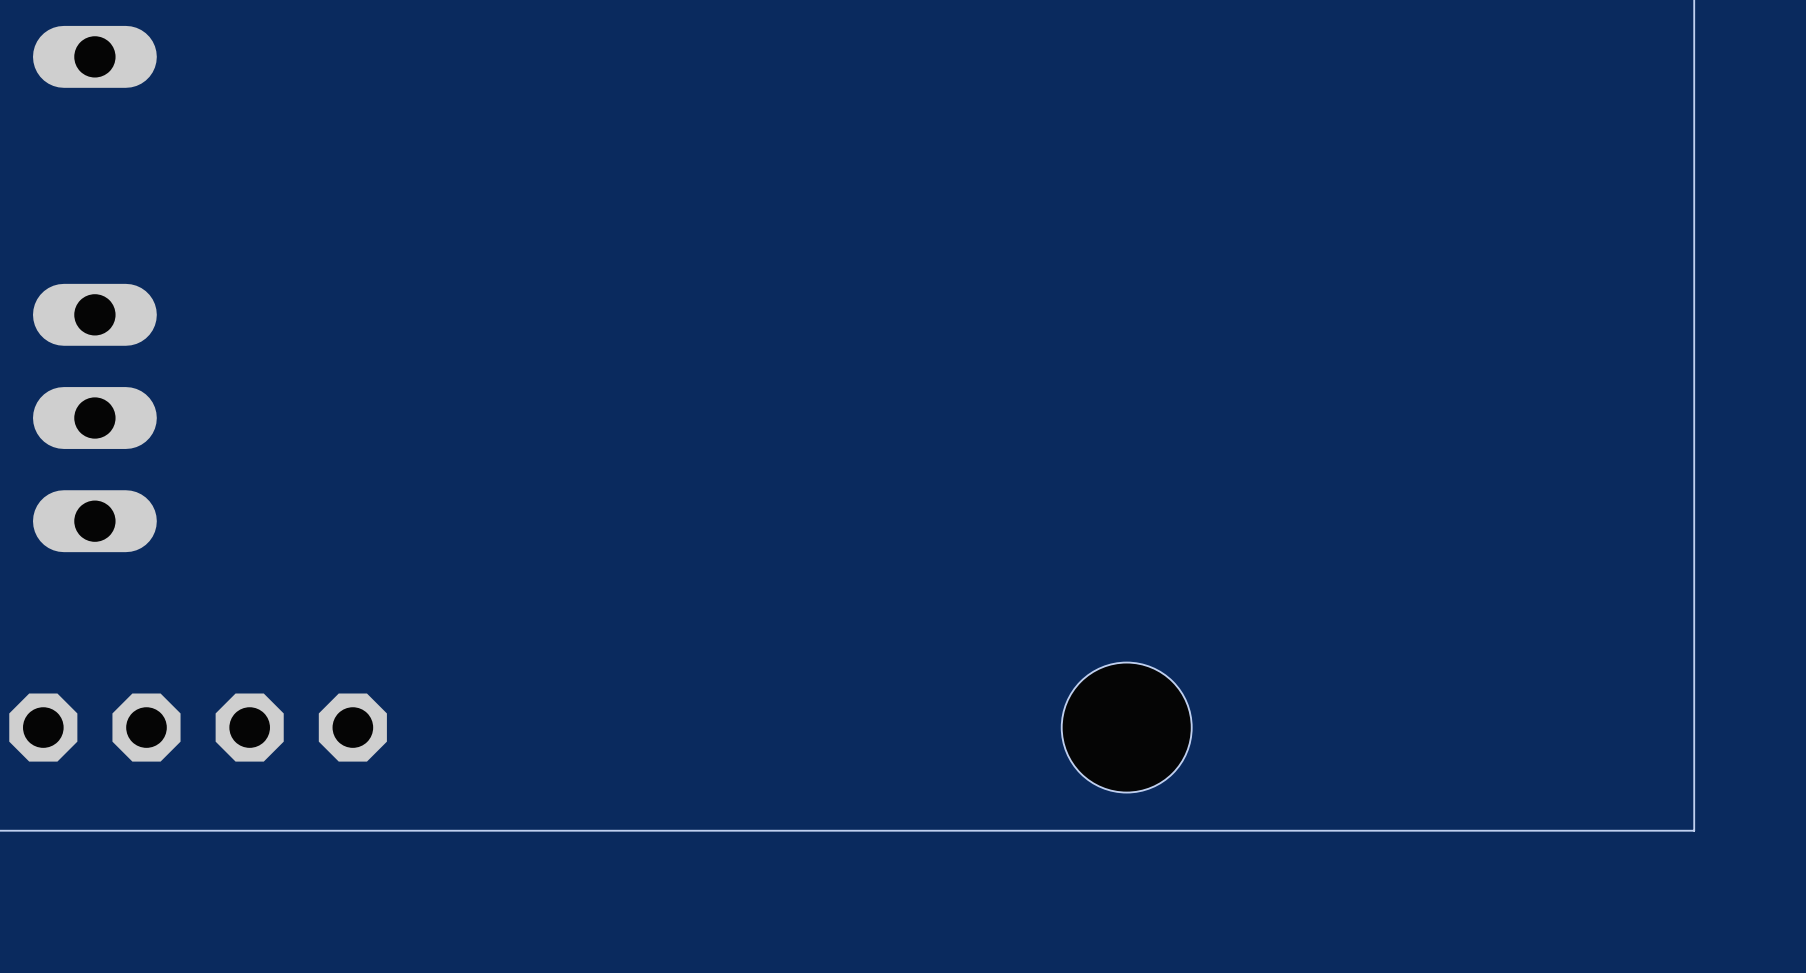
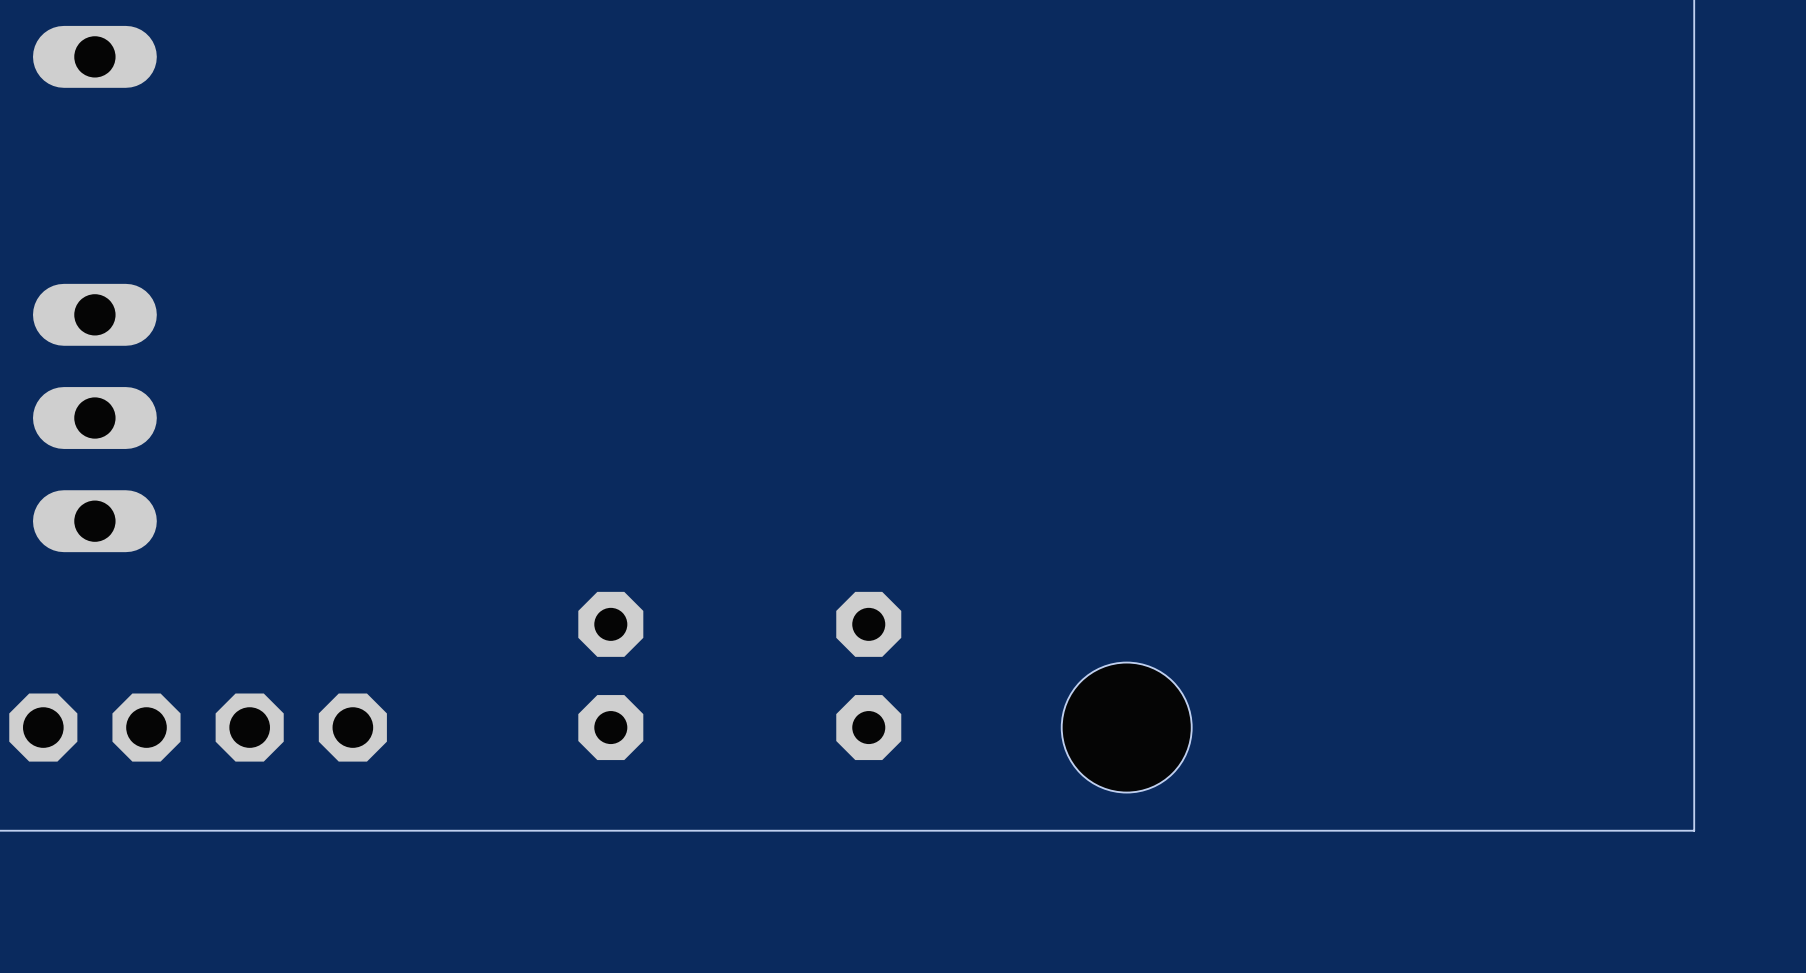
part: none -> (610, 675)
part: none -> (868, 675)

